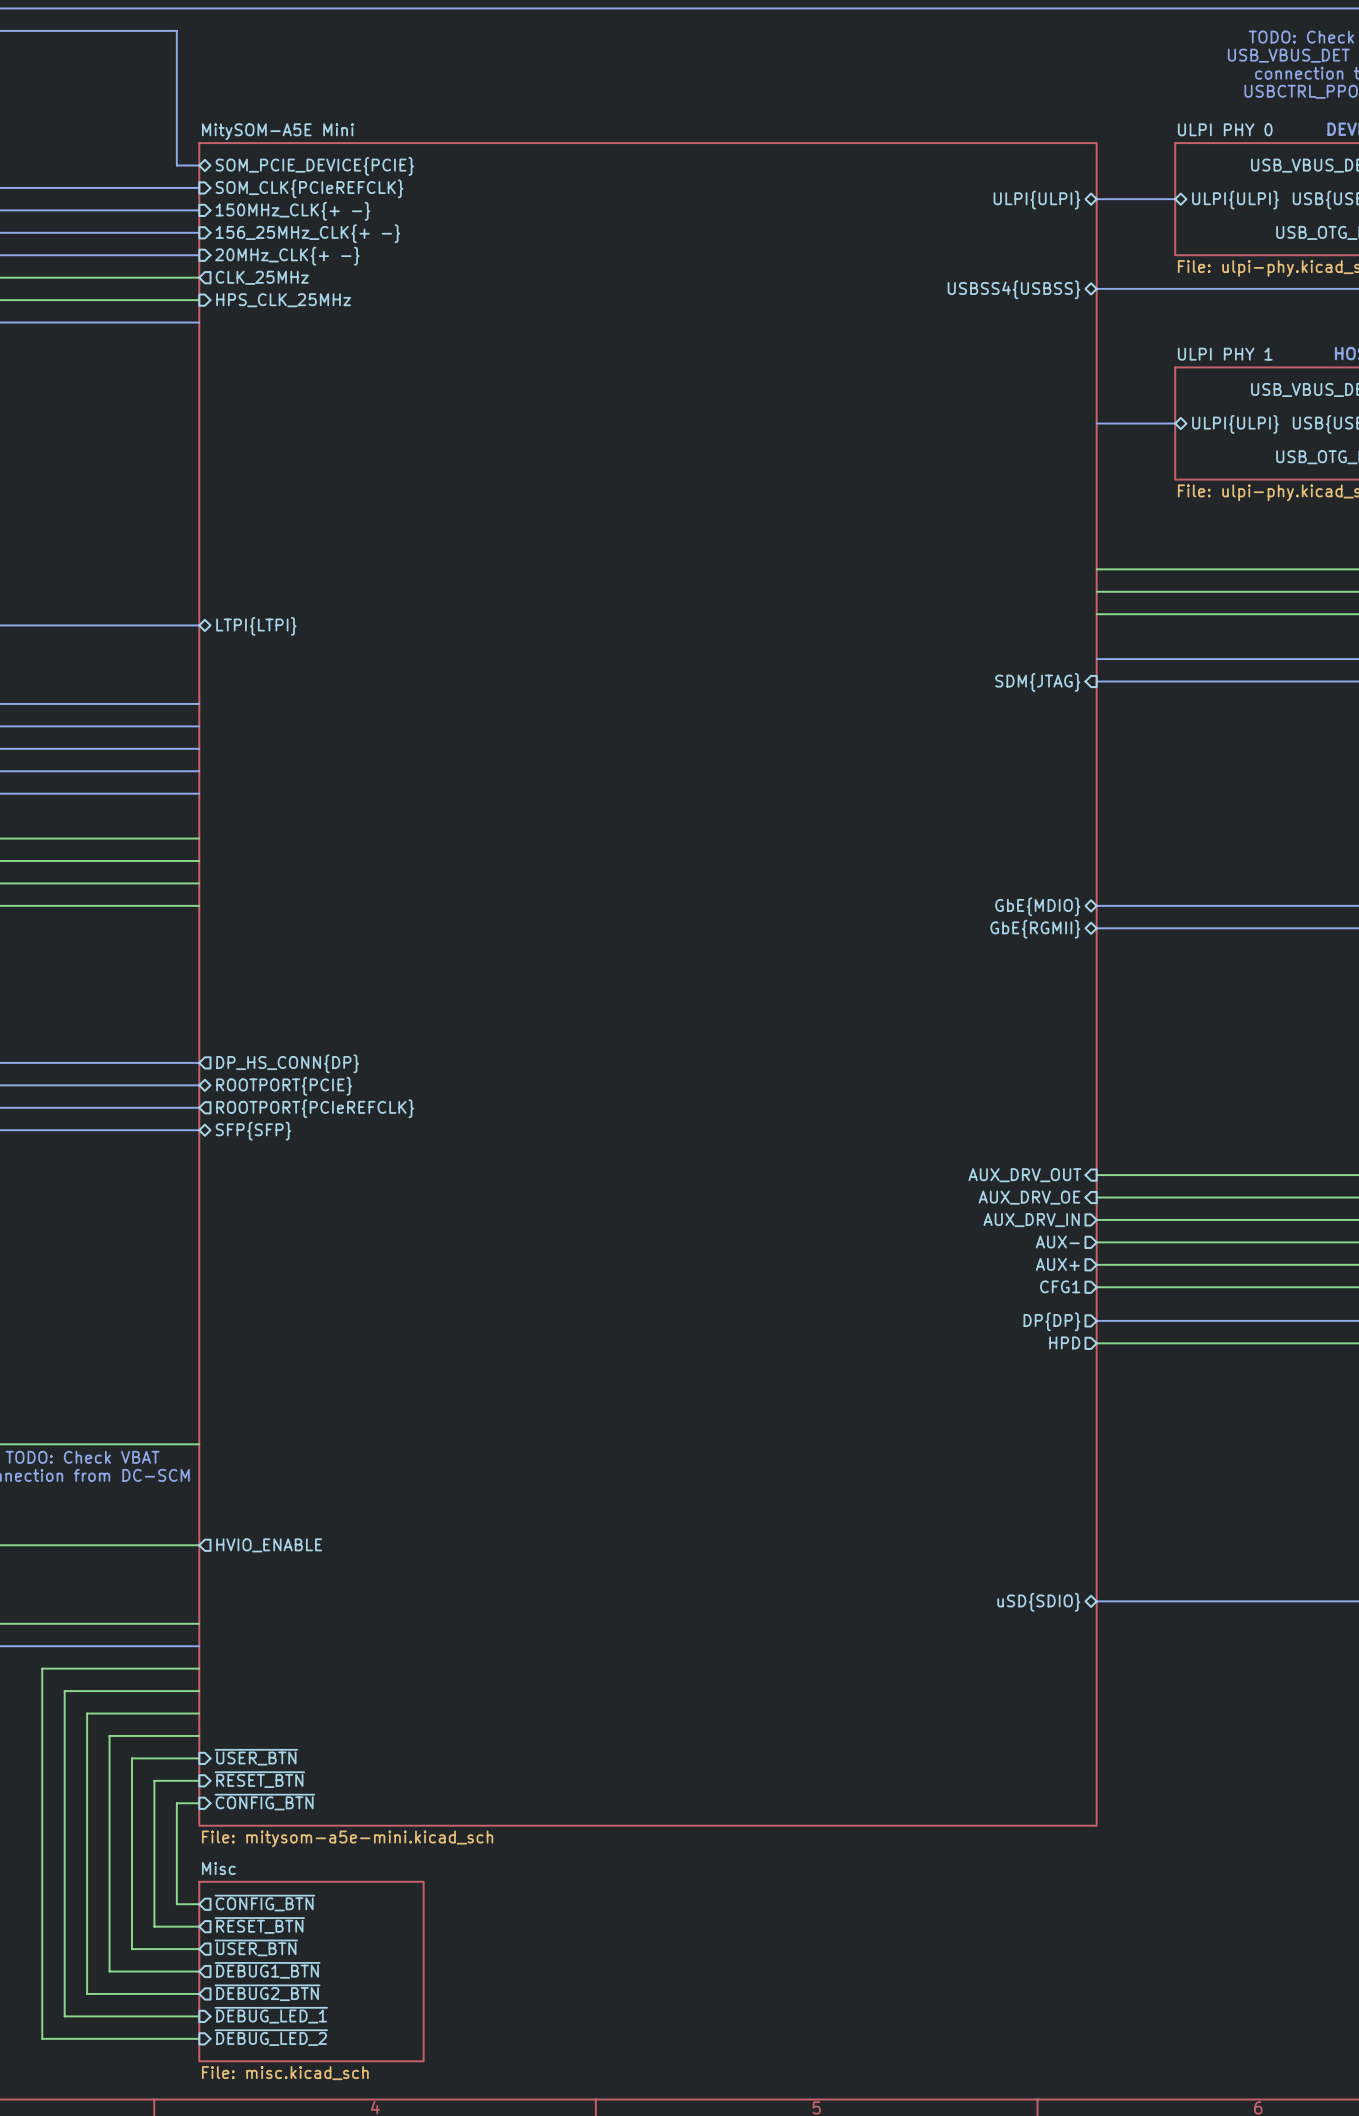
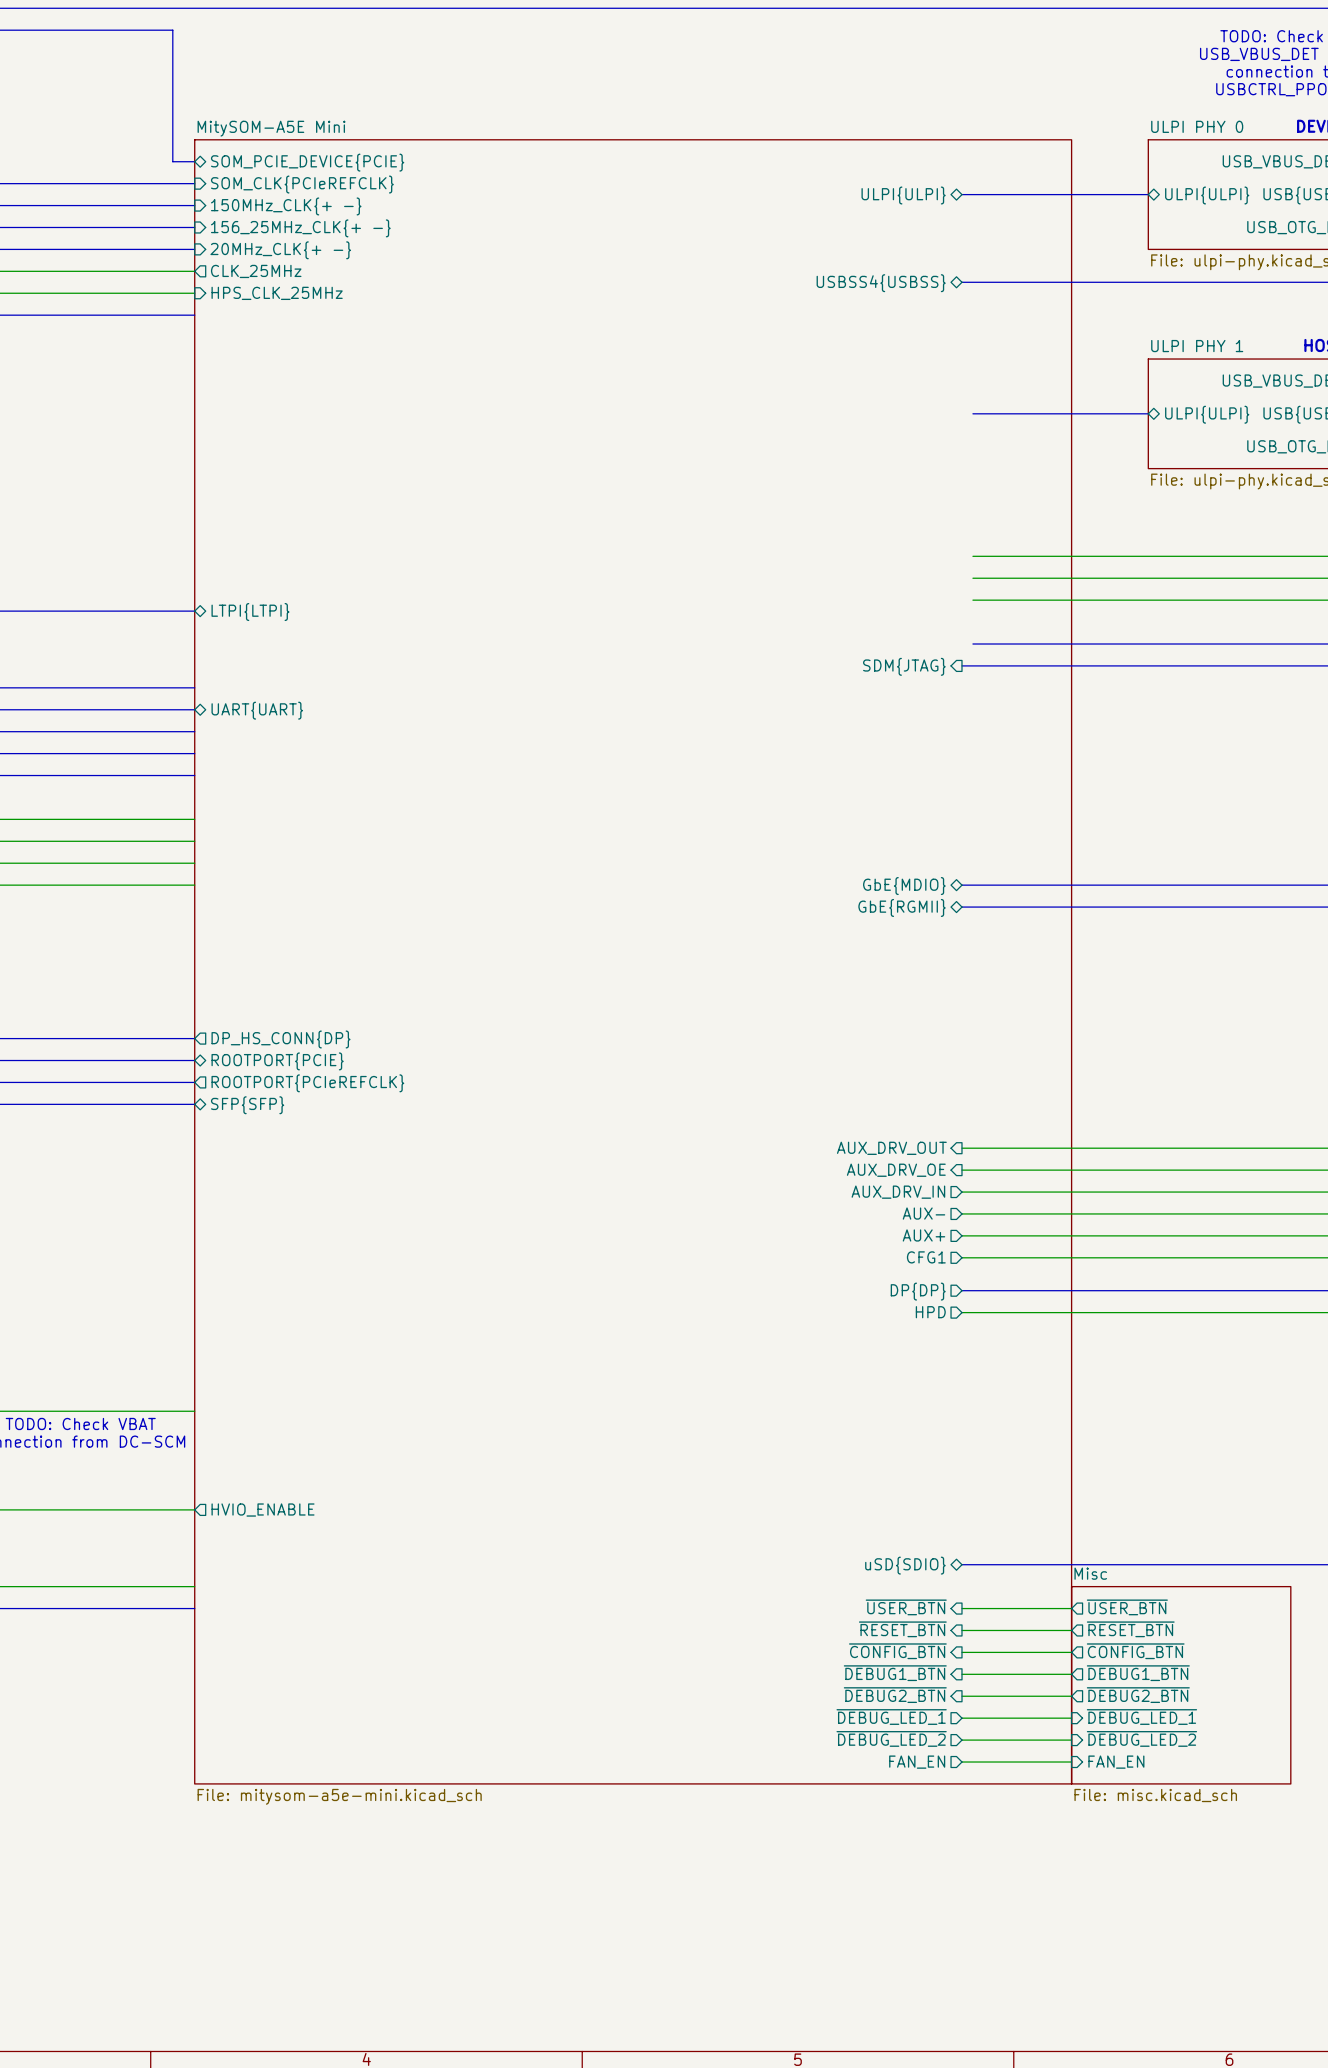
bus: none -> (961, 194) (1071, 194)
sheet pin position: ULPI{ULPI} (1036, 200) -> ULPI{ULPI} (903, 195)
bus: none -> (961, 282) (1071, 282)
sheet pin position: USBSS4{USBSS} (1013, 289) -> USBSS4{USBSS} (881, 283)
bus: none -> (972, 413) (1071, 413)
wire: none -> (972, 556) (1071, 556)
wire: none -> (972, 578) (1071, 578)
wire: none -> (972, 600) (1071, 600)
bus: none -> (972, 644) (1071, 644)
bus: none -> (961, 665) (1071, 665)
sheet pin position: SDM{JTAG} (1037, 682) -> SDM{JTAG} (904, 666)
sheet pin: none -> UART{UART} (257, 710)
bus: none -> (961, 885) (1071, 885)
sheet pin position: GbE{MDIO} (1037, 906) -> GbE{MDIO} (904, 886)
bus: none -> (961, 907) (1071, 907)
sheet pin position: GbE{RGMII} (1035, 929) -> GbE{RGMII} (902, 907)
wire: none -> (961, 1148) (1071, 1148)
sheet pin position: AUX_DRV_OUT (1024, 1175) -> AUX_DRV_OUT (891, 1148)
wire: none -> (961, 1170) (1071, 1170)
sheet pin position: AUX_DRV_OE (1029, 1197) -> AUX_DRV_OE (896, 1170)
wire: none -> (961, 1192) (1071, 1192)
sheet pin position: AUX_DRV_IN (1031, 1220) -> AUX_DRV_IN (898, 1192)
sheet pin position: AUX- (1057, 1241) -> AUX- (923, 1213)
wire: none -> (961, 1213) (1071, 1213)
wire: none -> (961, 1235) (1071, 1235)
sheet pin position: AUX+ (1057, 1264) -> AUX+ (923, 1235)
sheet pin position: CFG1 (1060, 1286) -> CFG1 (926, 1257)
wire: none -> (961, 1257) (1071, 1257)
bus: none -> (961, 1290) (1071, 1290)
sheet pin position: DP{DP} (1051, 1321) -> DP{DP} (918, 1291)
sheet pin position: HPD (1064, 1342) -> HPD (930, 1312)
wire: none -> (961, 1312) (1071, 1312)
bus: none -> (961, 1564) (1071, 1564)
sheet pin position: uSD{SDIO} (1038, 1602) -> uSD{SDIO} (905, 1565)
sheet pin: none -> ~{USER_BTN} (906, 1607)
sheet pin: none -> ~{USER_BTN} (1127, 1607)
wire: none -> (961, 1608) (1071, 1608)
sheet pin: none -> ~{RESET_BTN} (902, 1629)
sheet pin: none -> ~{RESET_BTN} (1130, 1629)
wire: (199, 1668) (42, 1668) (42, 2038) (199, 2038) -> none
wire: none -> (961, 1630) (1071, 1630)
sheet pin: none -> ~{CONFIG_BTN} (897, 1651)
sheet pin: none -> ~{CONFIG_BTN} (1135, 1651)
wire: (199, 1691) (64, 1691) (64, 2016) (199, 2016) -> none
wire: none -> (961, 1652) (1071, 1652)
sheet pin: none -> ~{DEBUG1_BTN} (895, 1673)
sheet pin: none -> ~{DEBUG1_BTN} (1138, 1673)
wire: (199, 1713) (87, 1713) (87, 1993) (199, 1993) -> none
wire: none -> (961, 1674) (1071, 1674)
sheet Misc: none -> File: misc.kicad_sch (1181, 1685)
sheet pin: none -> ~{DEBUG2_BTN} (895, 1695)
sheet pin: none -> ~{DEBUG2_BTN} (1138, 1695)
wire: (199, 1735) (109, 1735) (109, 1971) (199, 1971) -> none
wire: none -> (961, 1696) (1071, 1696)
sheet pin: ~{USER_BTN} (256, 1757) -> none
sheet pin: none -> ~{DEBUG_LED_1} (891, 1717)
sheet pin: none -> ~{DEBUG_LED_1} (1141, 1717)
wire: (199, 1758) (131, 1758) (131, 1949) (199, 1949) -> none
wire: none -> (961, 1718) (1071, 1718)
sheet pin: ~{RESET_BTN} (259, 1779) -> none
sheet pin: none -> ~{DEBUG_LED_2} (891, 1738)
sheet pin: none -> ~{DEBUG_LED_2} (1141, 1738)
wire: (199, 1780) (154, 1780) (154, 1926) (199, 1926) -> none
wire: none -> (961, 1740) (1071, 1740)
sheet pin: ~{CONFIG_BTN} (264, 1802) -> none
wire: (199, 1803) (176, 1803) (176, 1904) (199, 1904) -> none
sheet pin: none -> FAN_EN (917, 1762)
wire: none -> (961, 1762) (1071, 1762)
sheet pin: none -> FAN_EN (1116, 1762)
sheet pin: ~{CONFIG_BTN} (264, 1903) -> none
sheet pin: ~{RESET_BTN} (259, 1925) -> none
sheet pin: ~{USER_BTN} (256, 1947) -> none
sheet pin: ~{DEBUG1_BTN} (267, 1970) -> none
sheet Misc: File: misc.kicad_sch (311, 1971) -> none
sheet pin: ~{DEBUG2_BTN} (267, 1992) -> none
sheet pin: ~{DEBUG_LED_1} (271, 2015) -> none
sheet pin: ~{DEBUG_LED_2} (271, 2037) -> none

